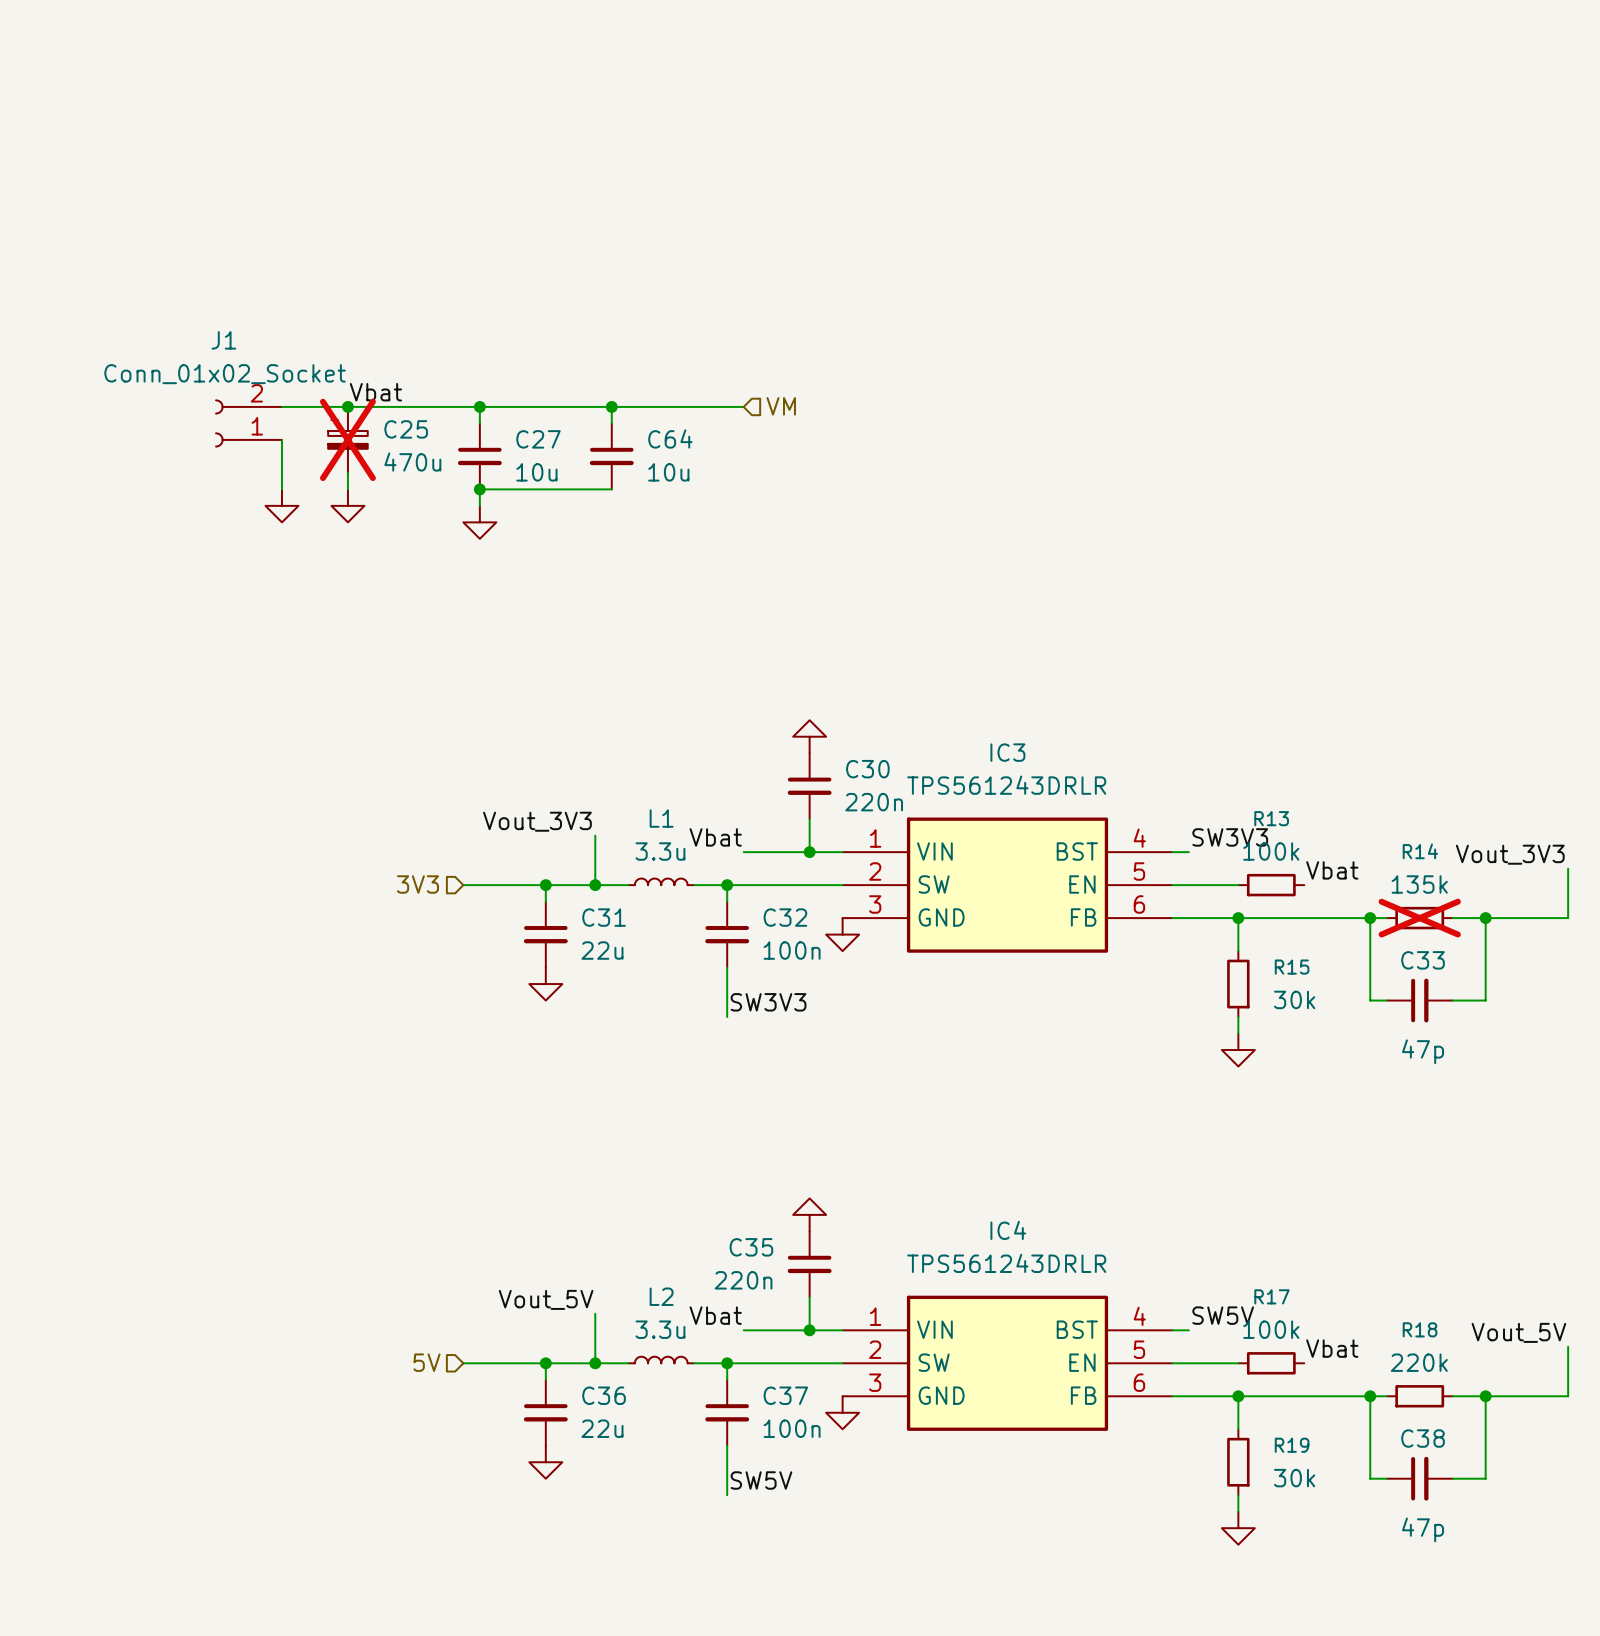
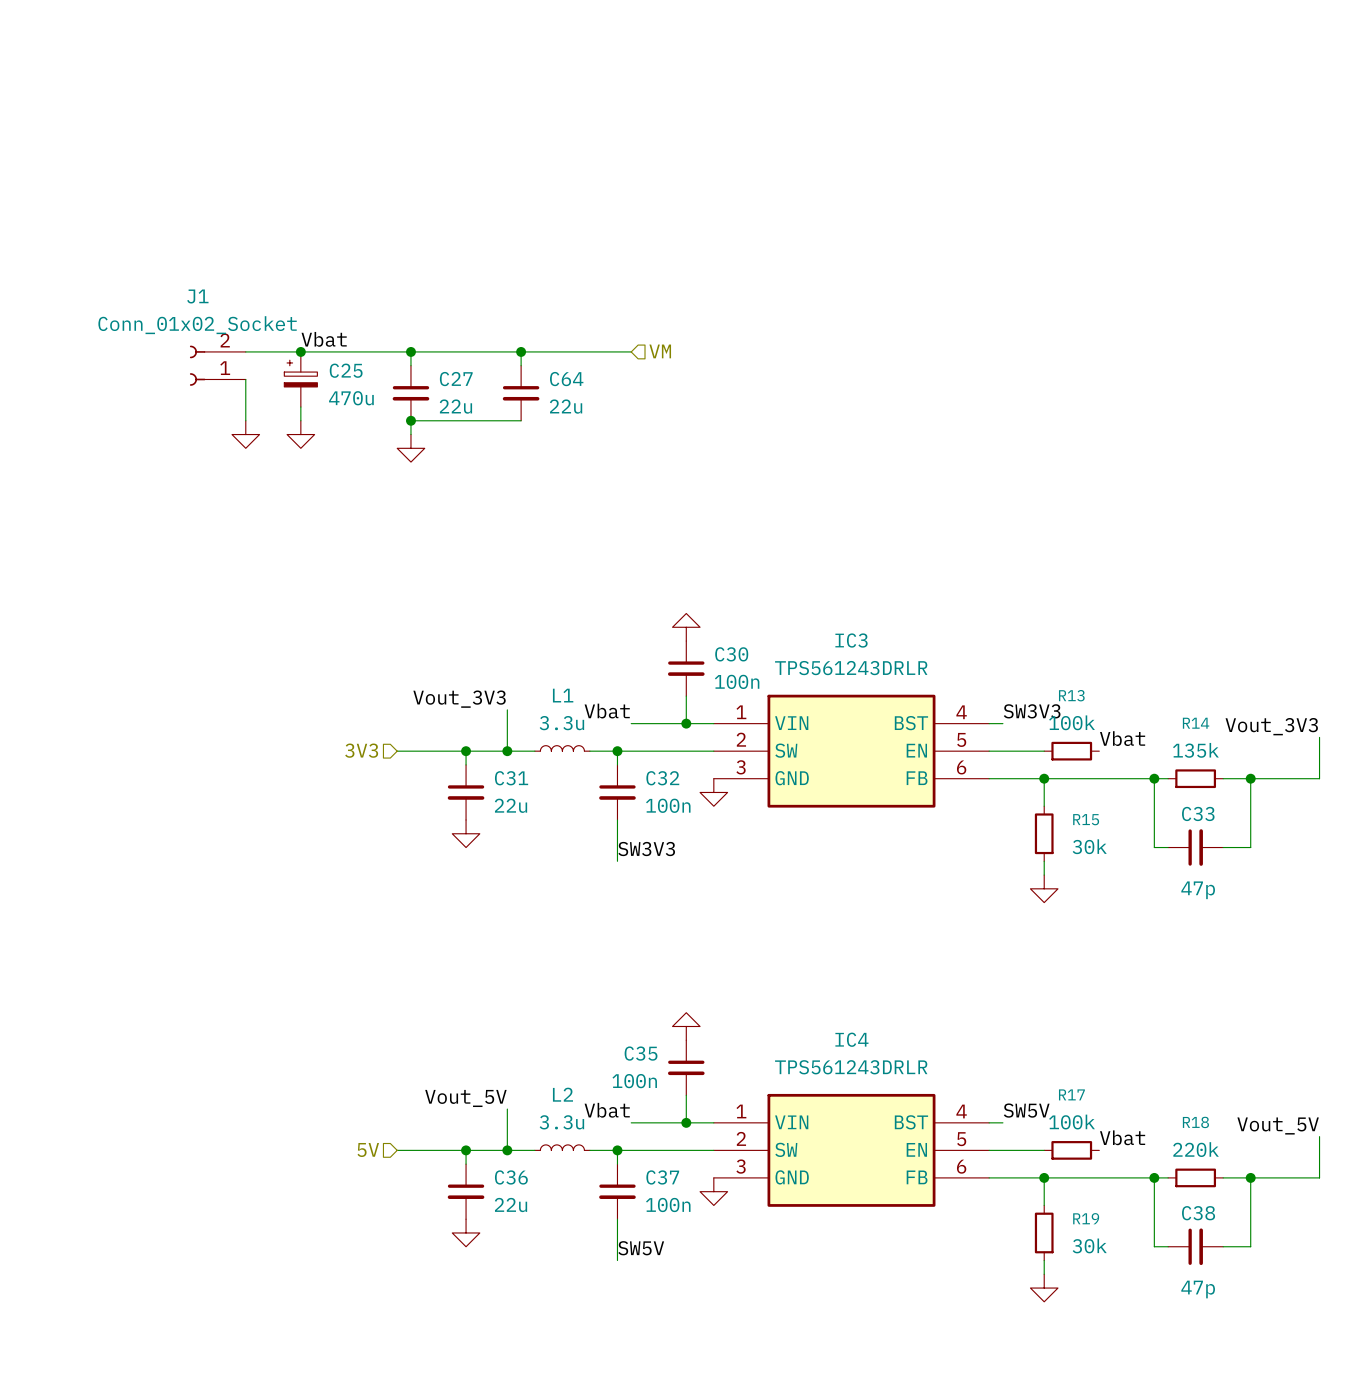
C25 do-not-place cross: (347, 439) -> none
C27 value: 10u (536, 472) -> 22u (455, 406)
C64 value: 10u (668, 472) -> 22u (566, 406)
C30 value: 220n (874, 802) -> 100n (737, 681)
R14 do-not-place cross: (1419, 918) -> none
C35 value: 220n (743, 1280) -> 100n (634, 1081)

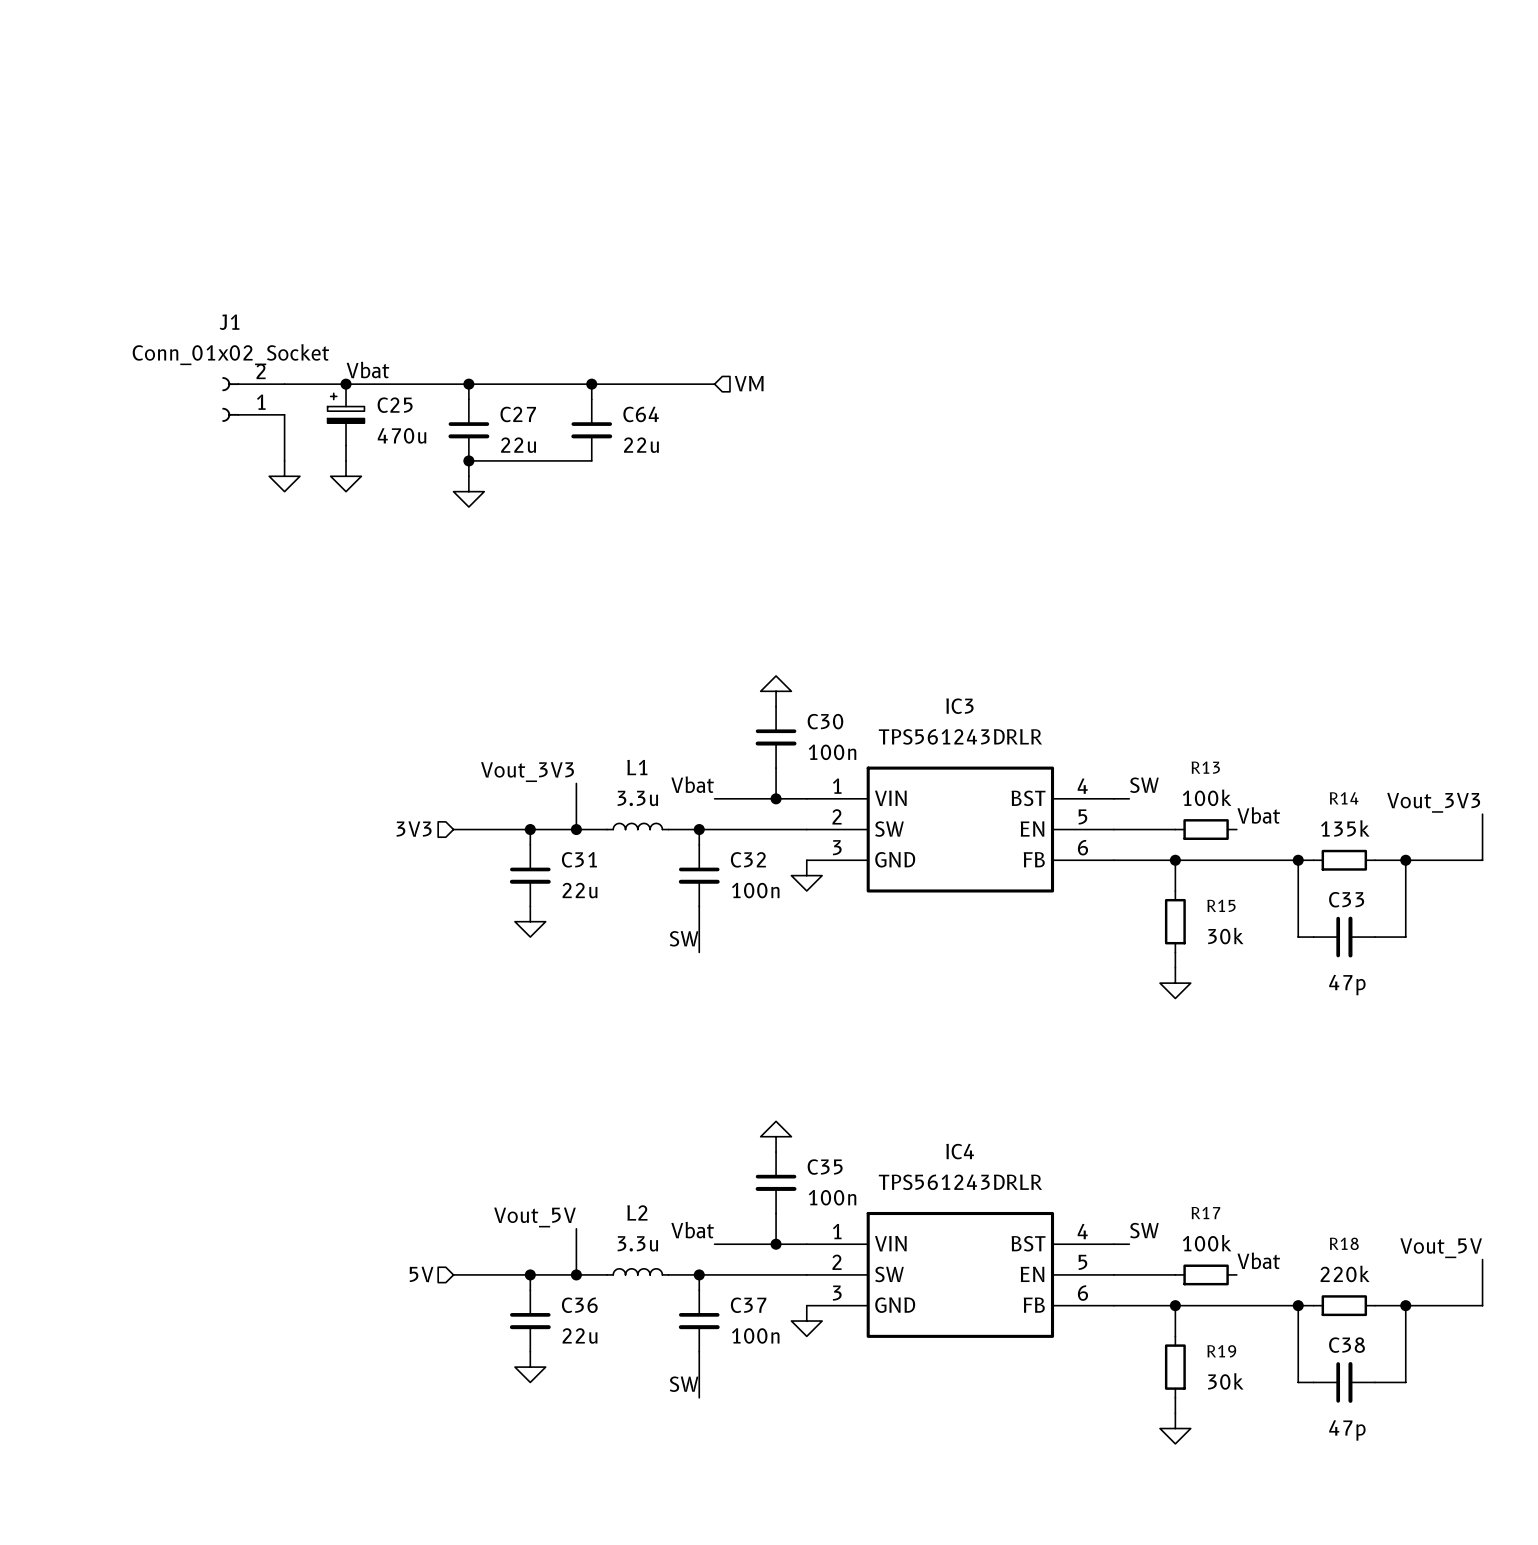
label: SW3V3 (1032, 711) -> SW (1144, 785)
label: SW3V3 (646, 849) -> SW (684, 938)
C35 name position: C35 (641, 1053) -> C35 (825, 1167)
C35 value position: 100n (634, 1081) -> 100n (832, 1197)
label: SW5V (1026, 1110) -> SW (1144, 1230)
label: SW5V (641, 1248) -> SW (684, 1384)

